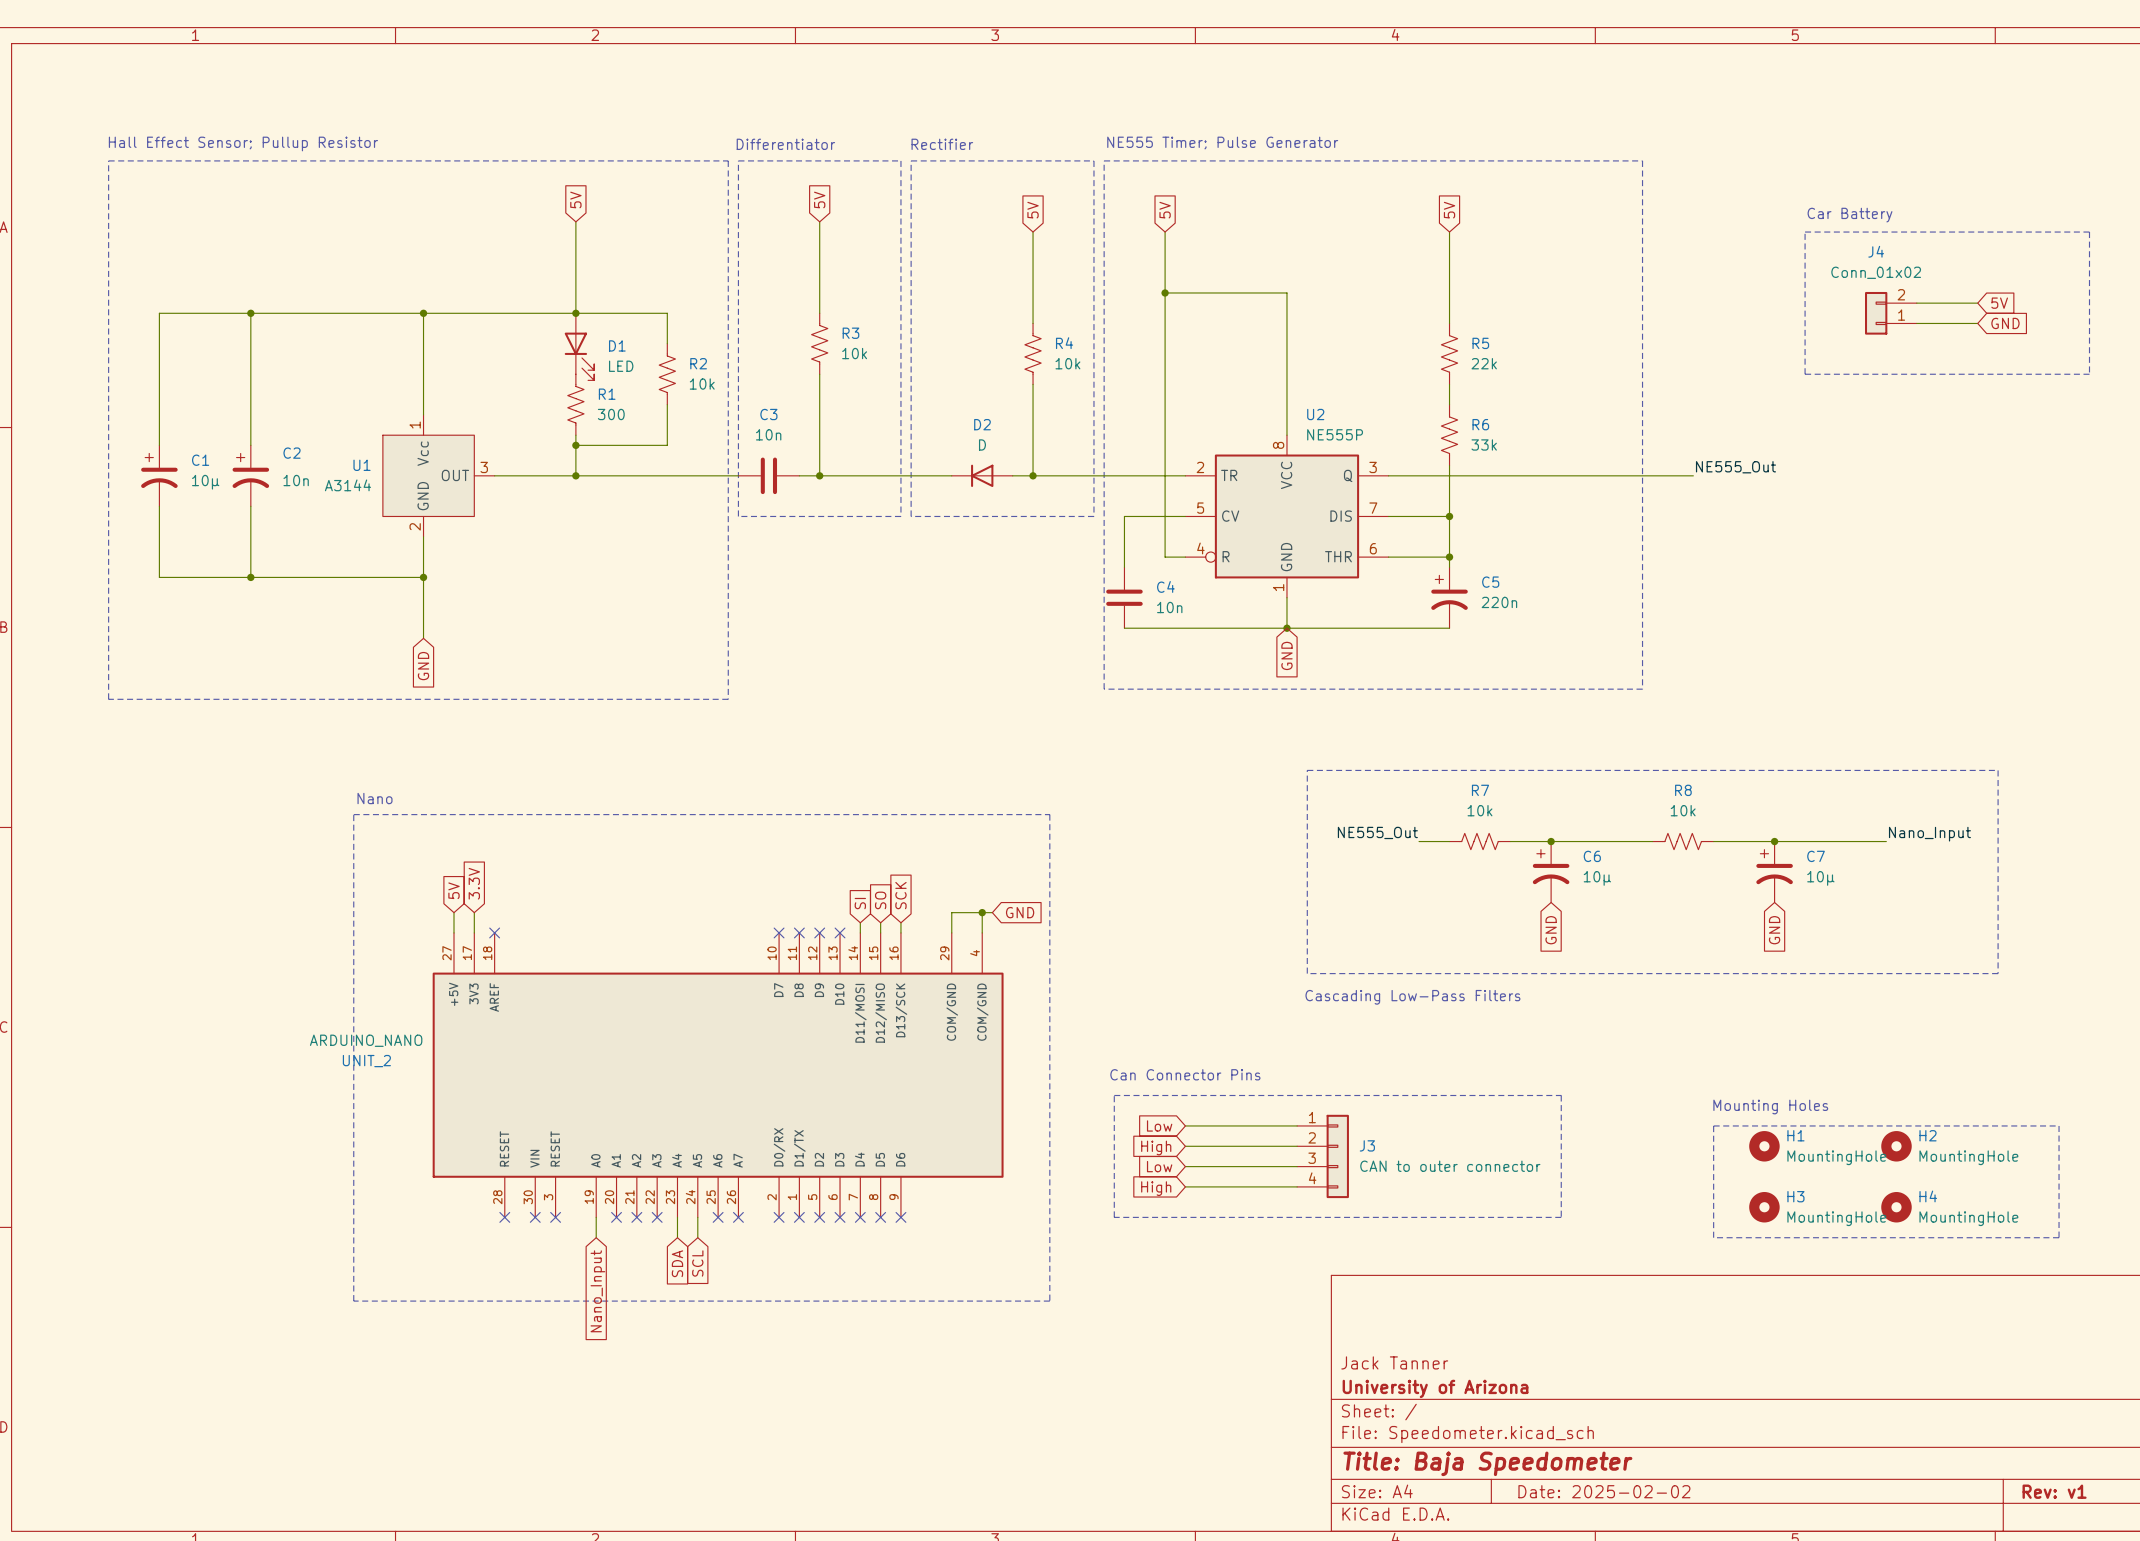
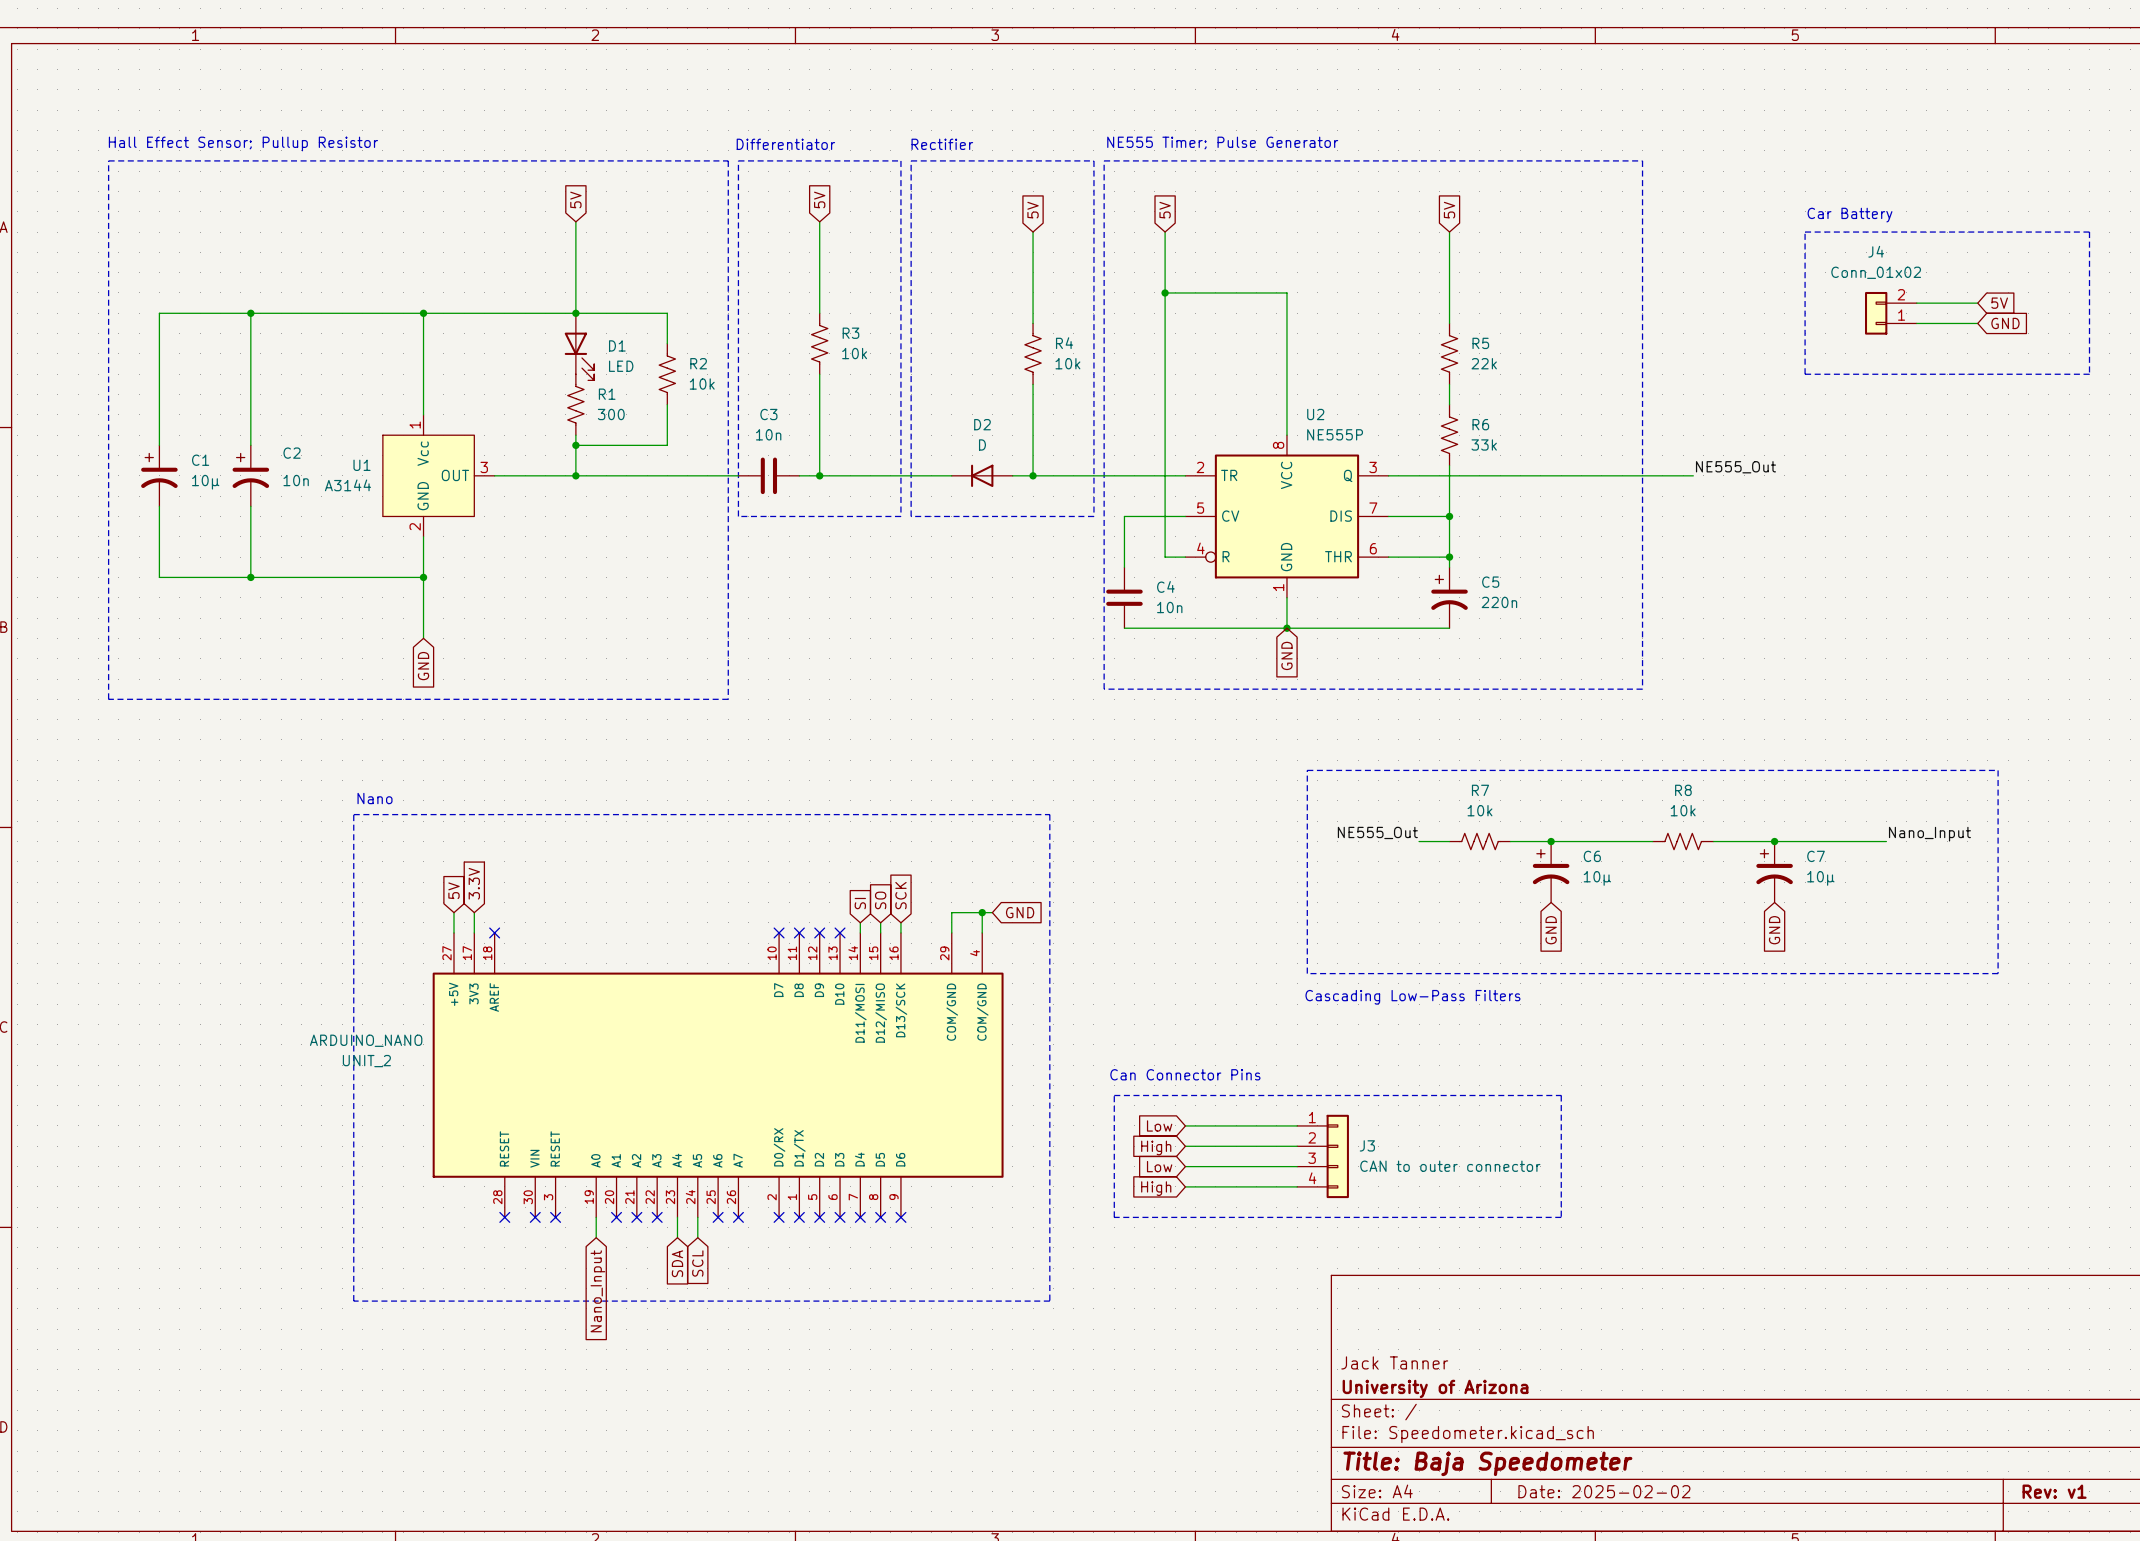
text: Mounting Holes (1770, 1107) -> none
line: (1713, 1125) (2059, 1125) (2059, 1237) (1713, 1237) (1713, 1125) -> none
H1: MountingHole (1764, 1146) -> none
H2: MountingHole (1896, 1146) -> none
H3: MountingHole (1764, 1207) -> none
H4: MountingHole (1896, 1207) -> none

